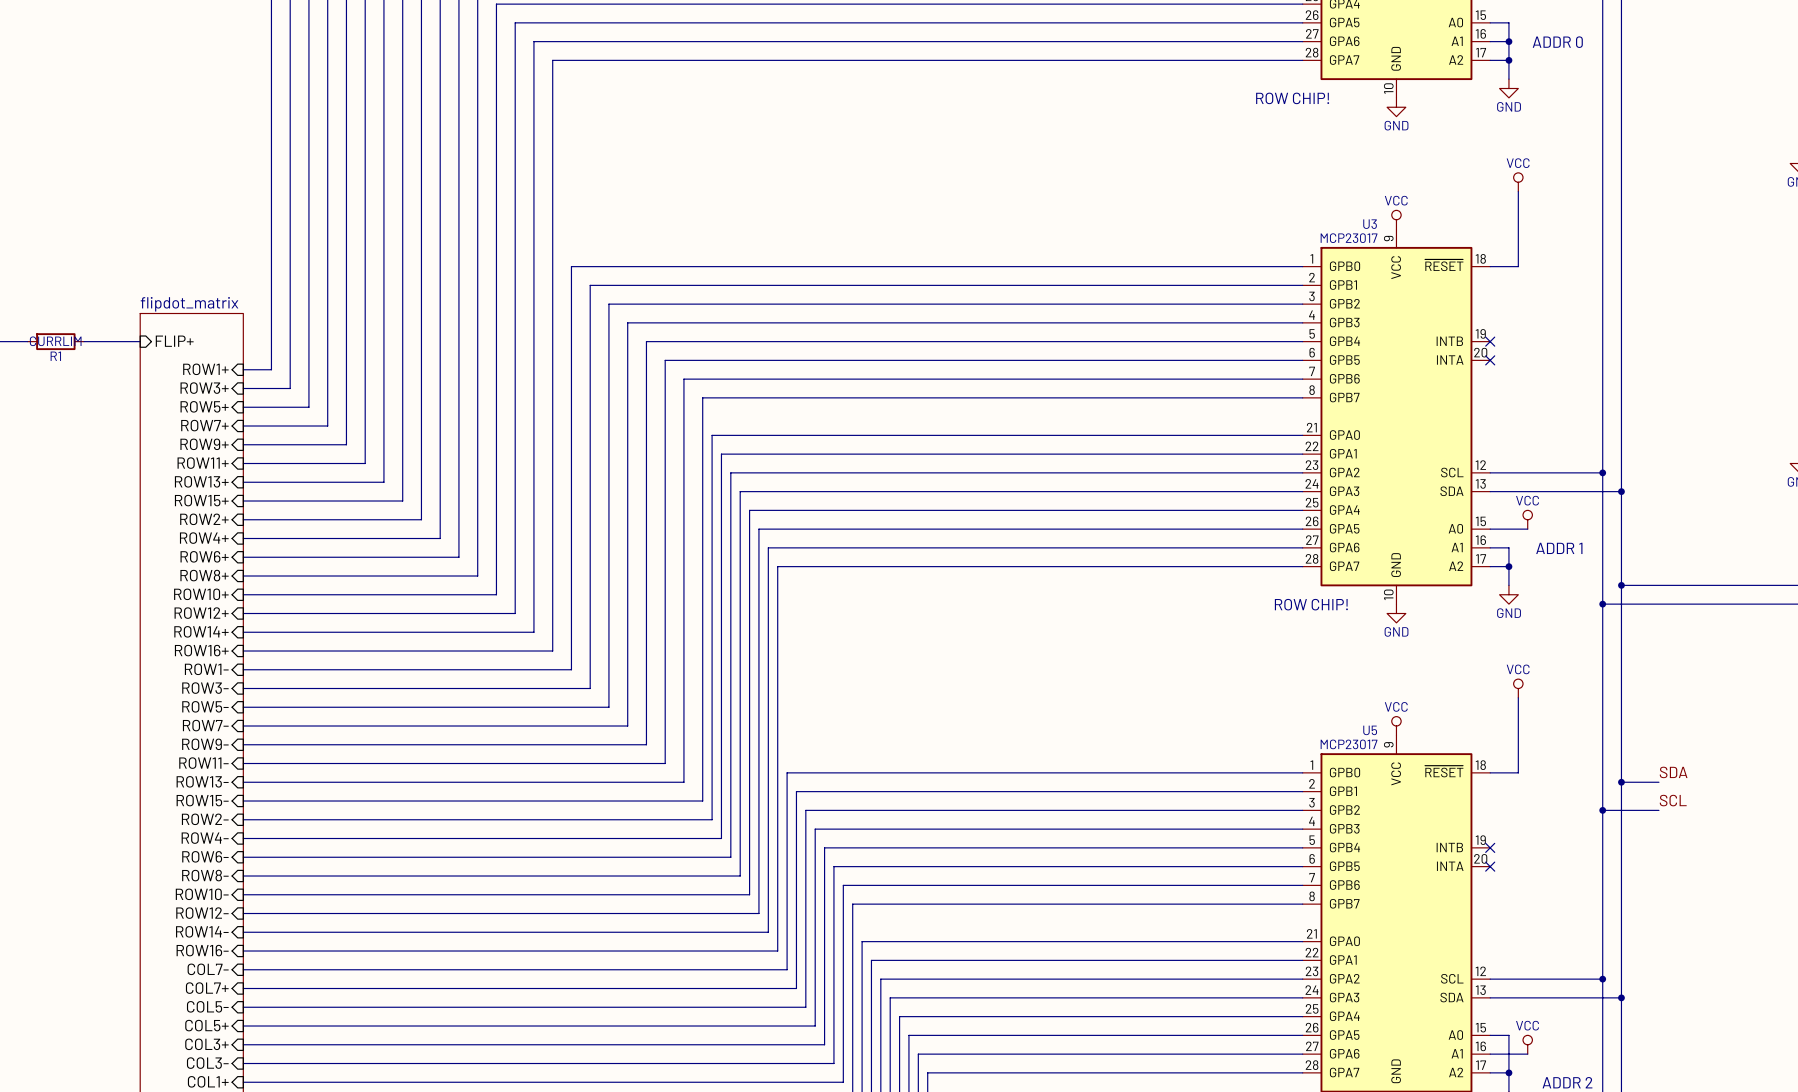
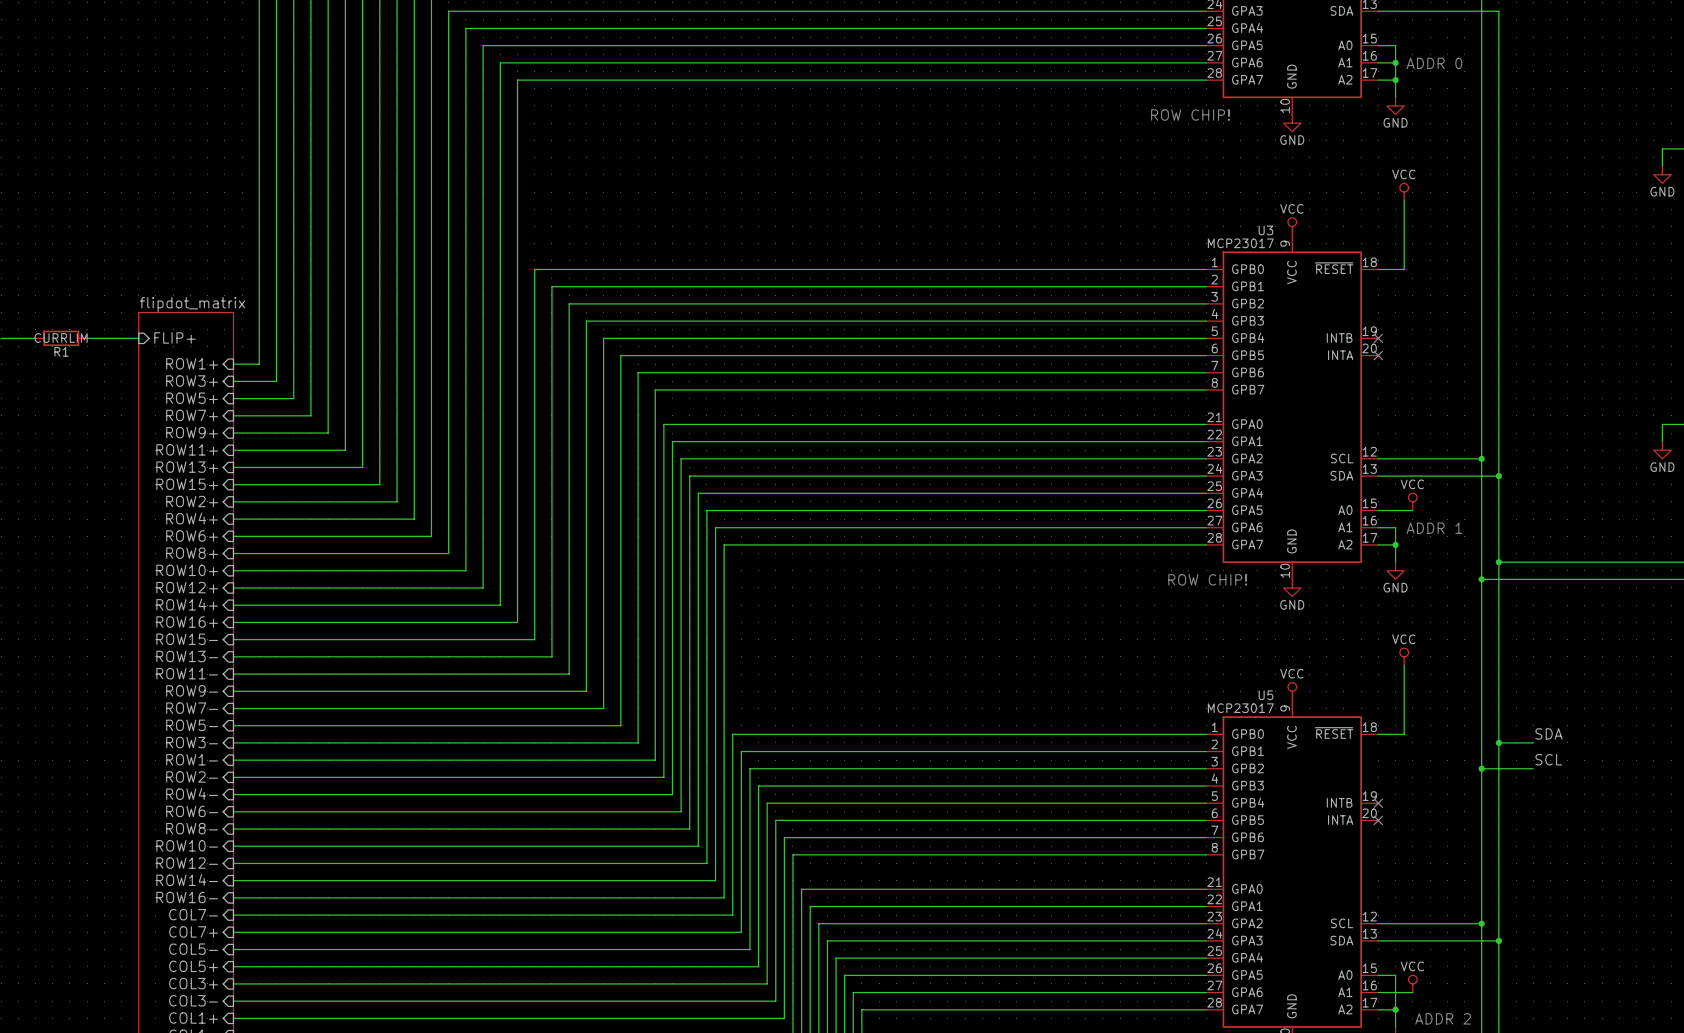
sheet pin: ROW1- (206, 669) -> ROW15- (187, 639)
sheet pin: ROW3- (205, 688) -> ROW13- (187, 656)
sheet pin: ROW5- (205, 706) -> ROW11- (187, 673)
sheet pin: ROW7- (205, 725) -> ROW9- (192, 690)
sheet pin: ROW9- (205, 744) -> ROW7- (192, 708)
sheet pin: ROW11- (203, 763) -> ROW5- (192, 725)
sheet pin: ROW13- (202, 781) -> ROW3- (192, 742)
sheet pin: ROW15- (202, 800) -> ROW1- (192, 759)

